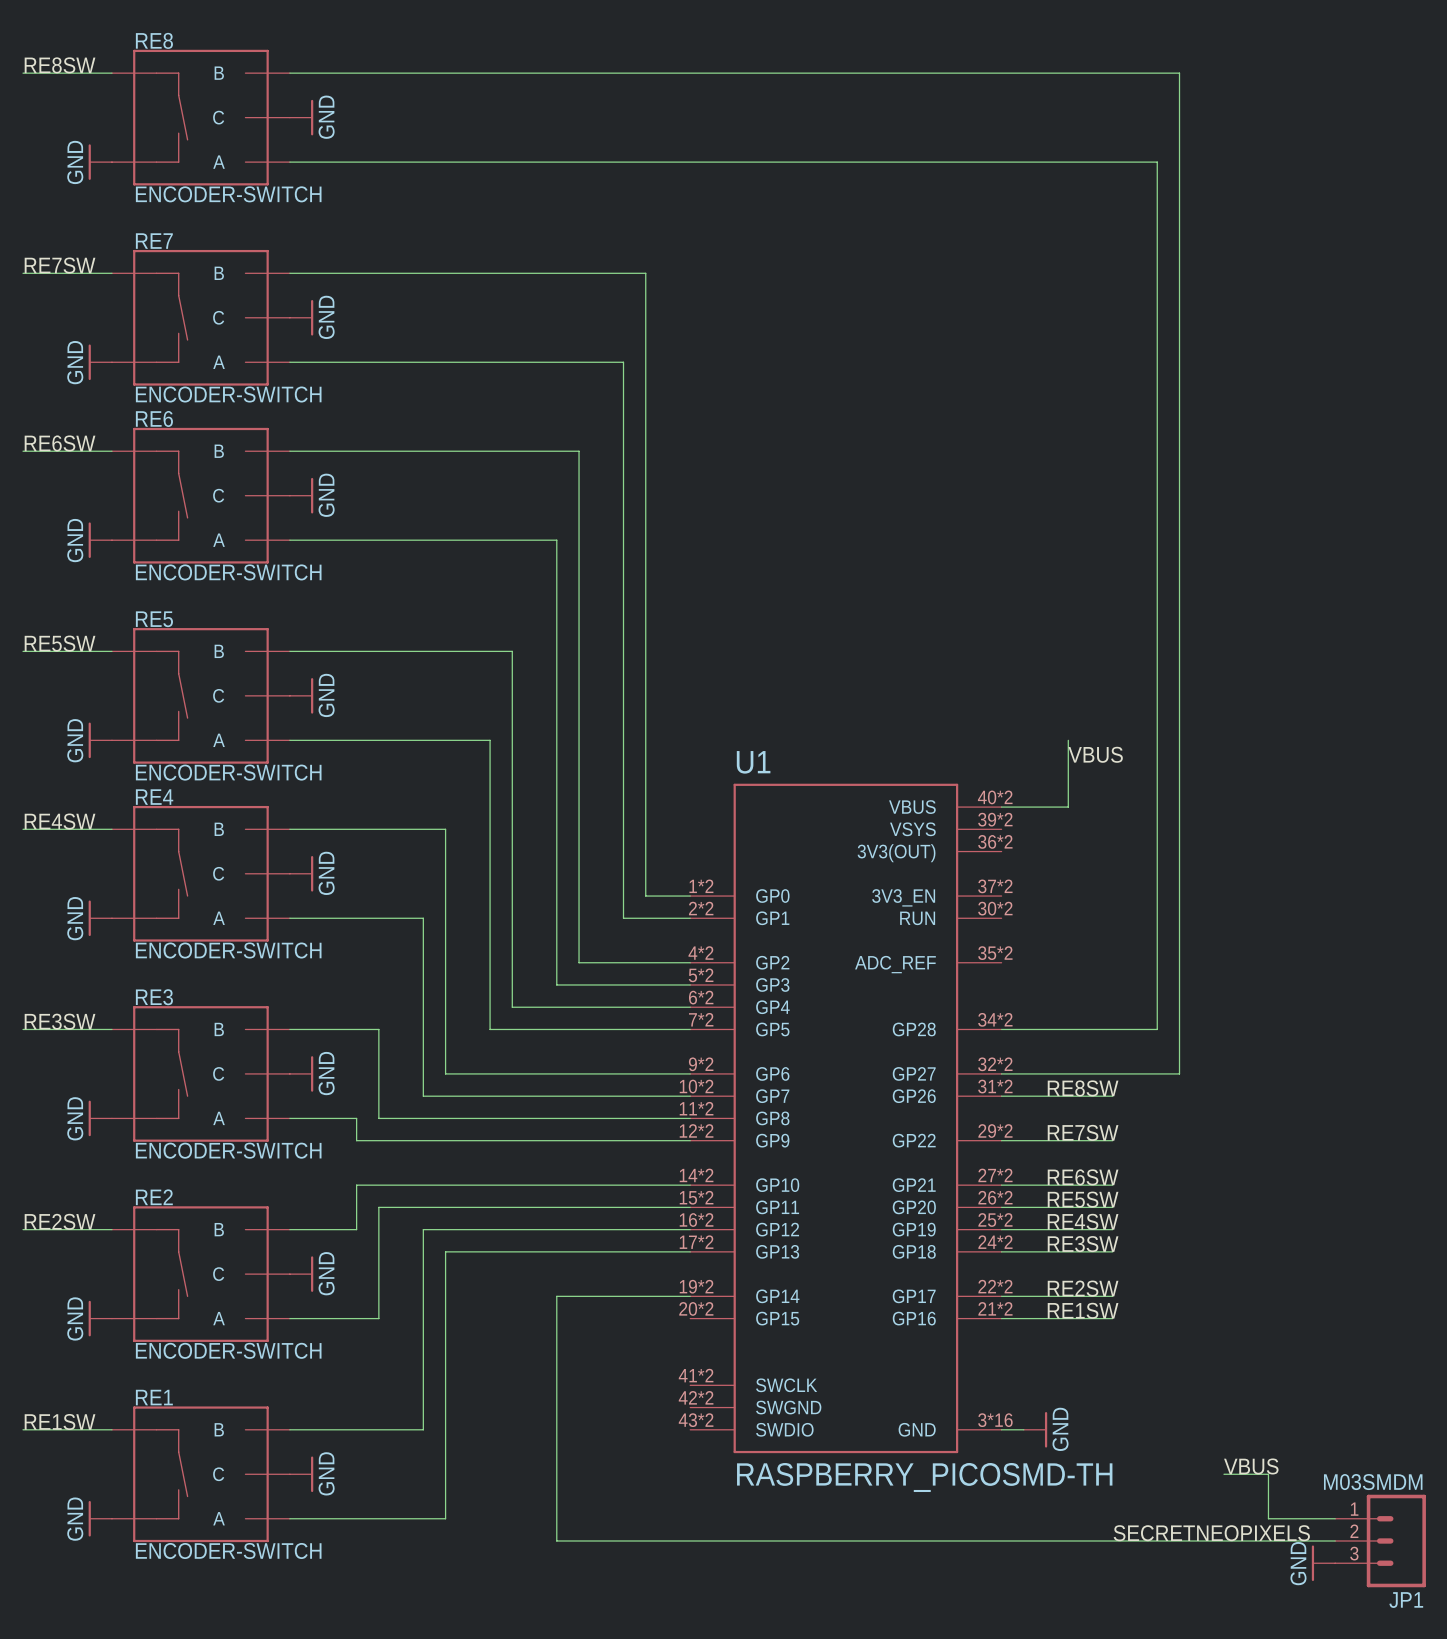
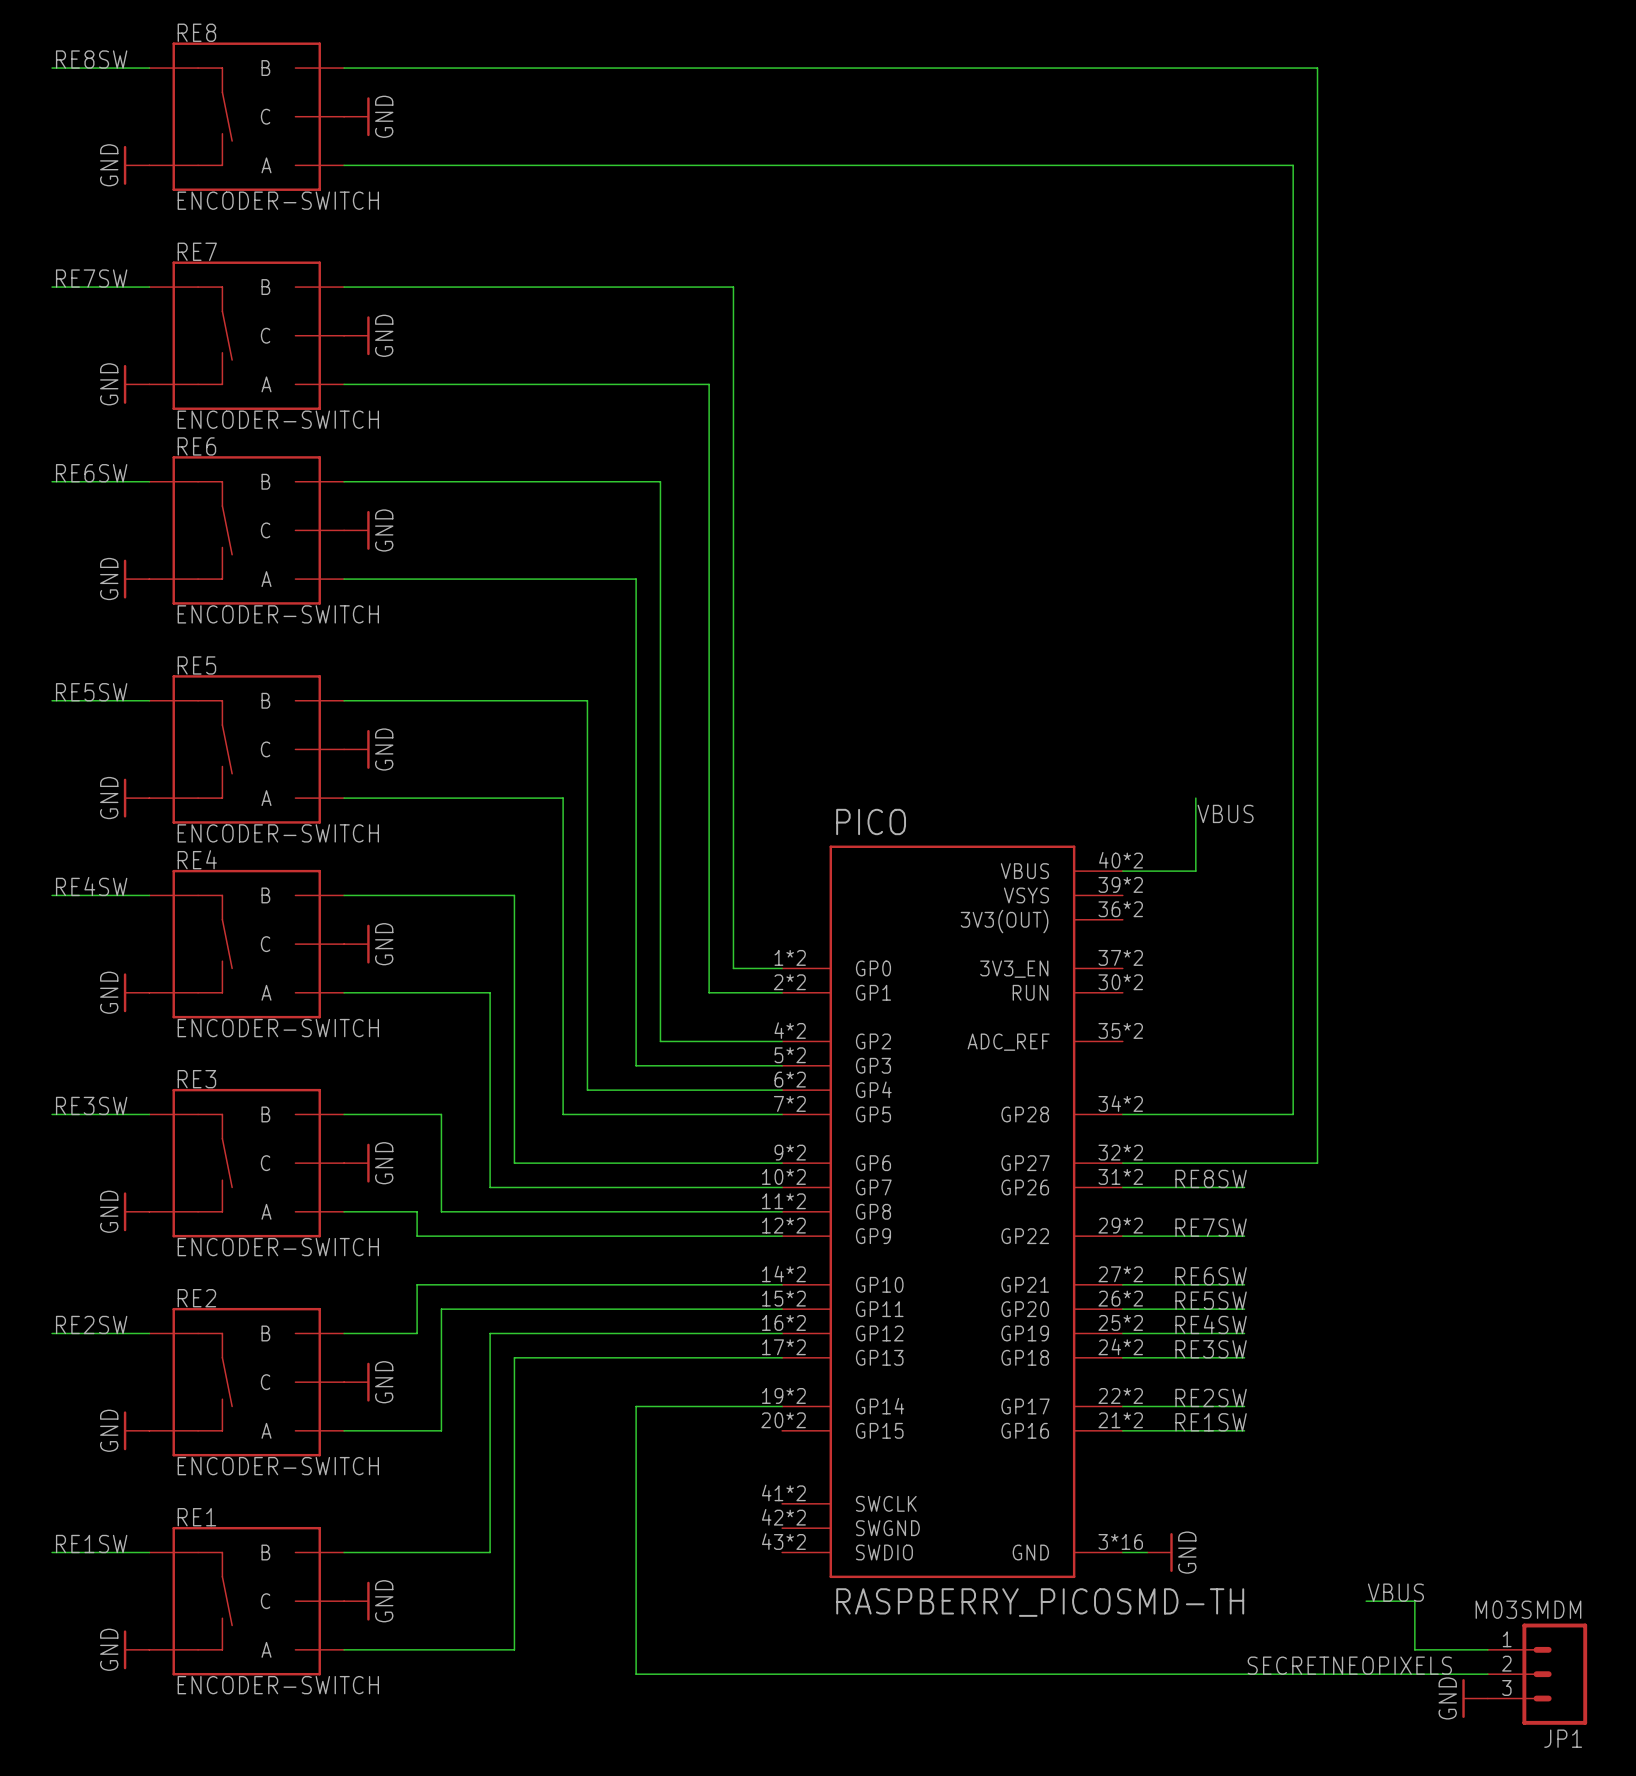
U1 name: U1 (753, 762) -> PICO (871, 821)

